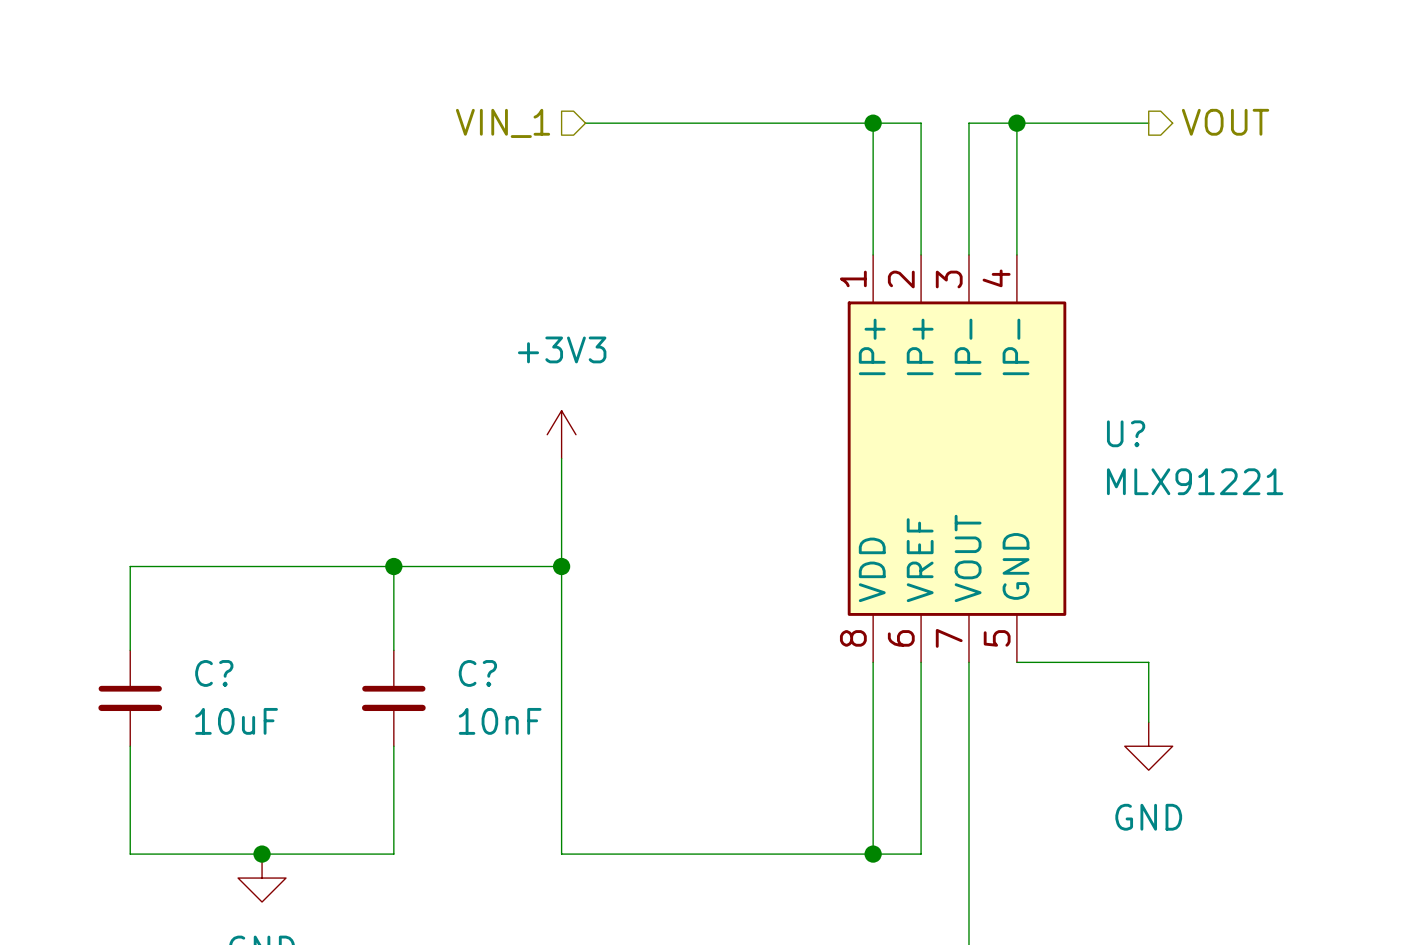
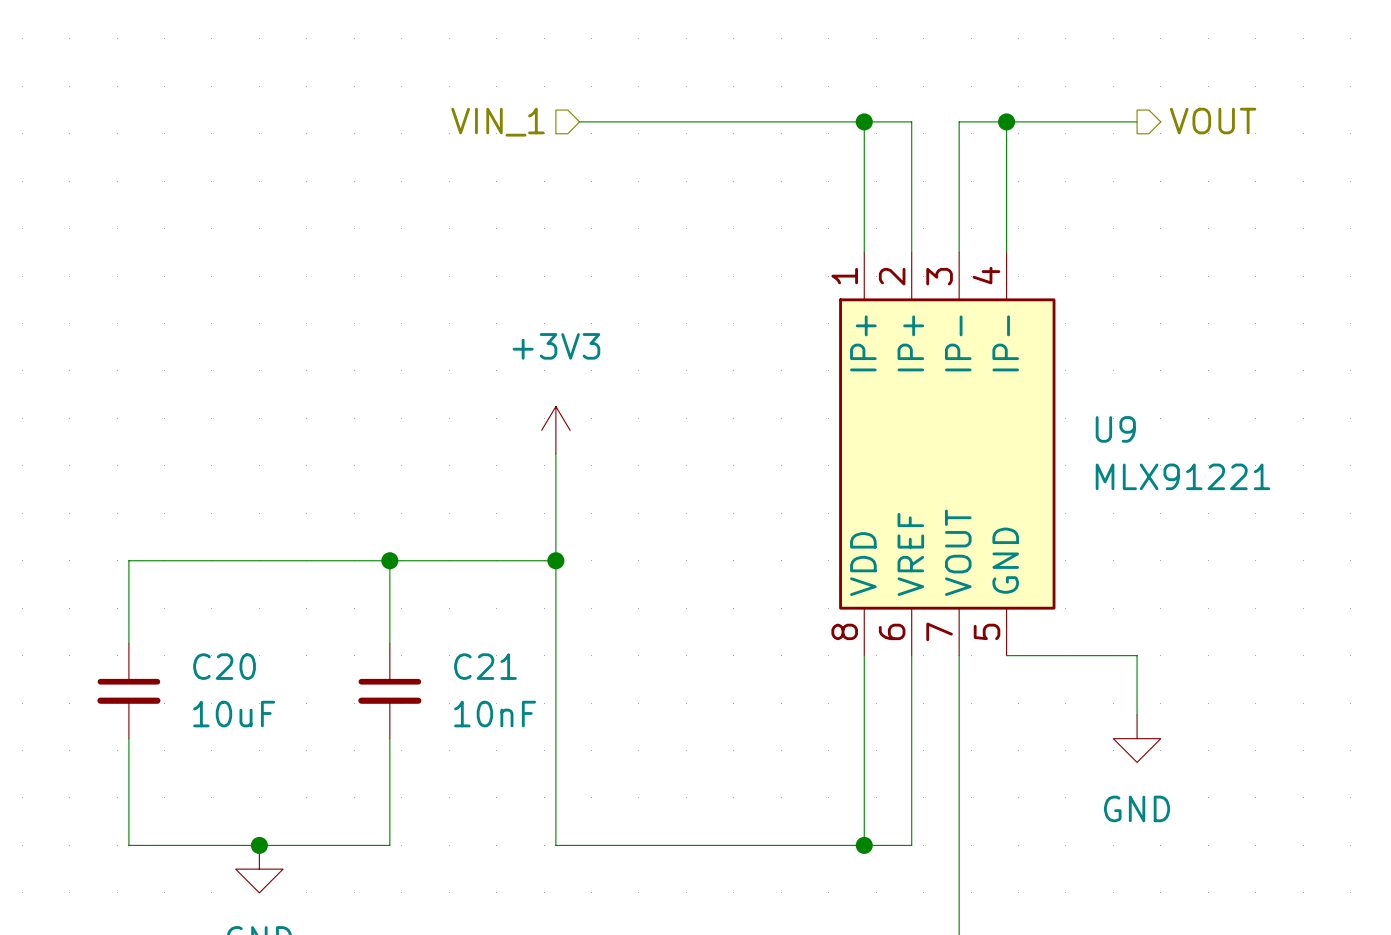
U? name: U? (1126, 433) -> U9 (1115, 429)
C? name: C? (214, 673) -> C20 (224, 666)
C? name: C? (477, 673) -> C21 (485, 666)

